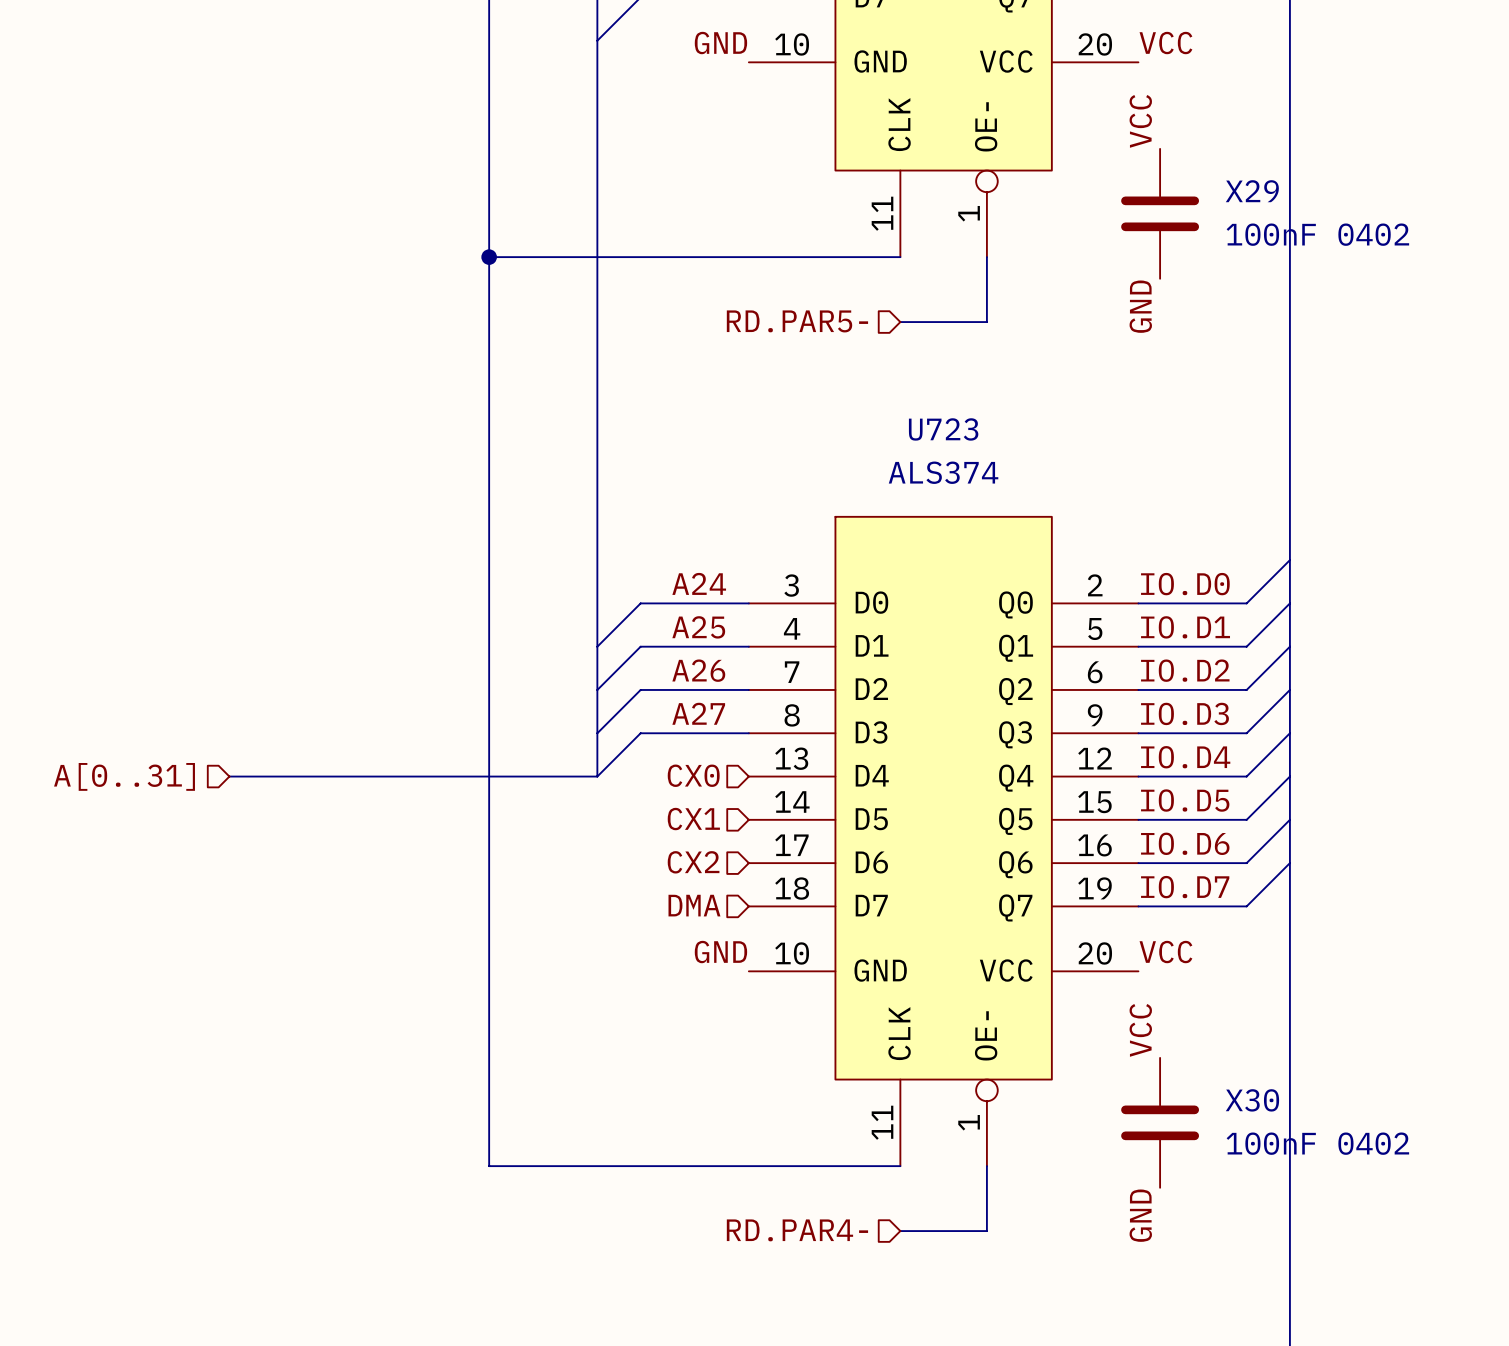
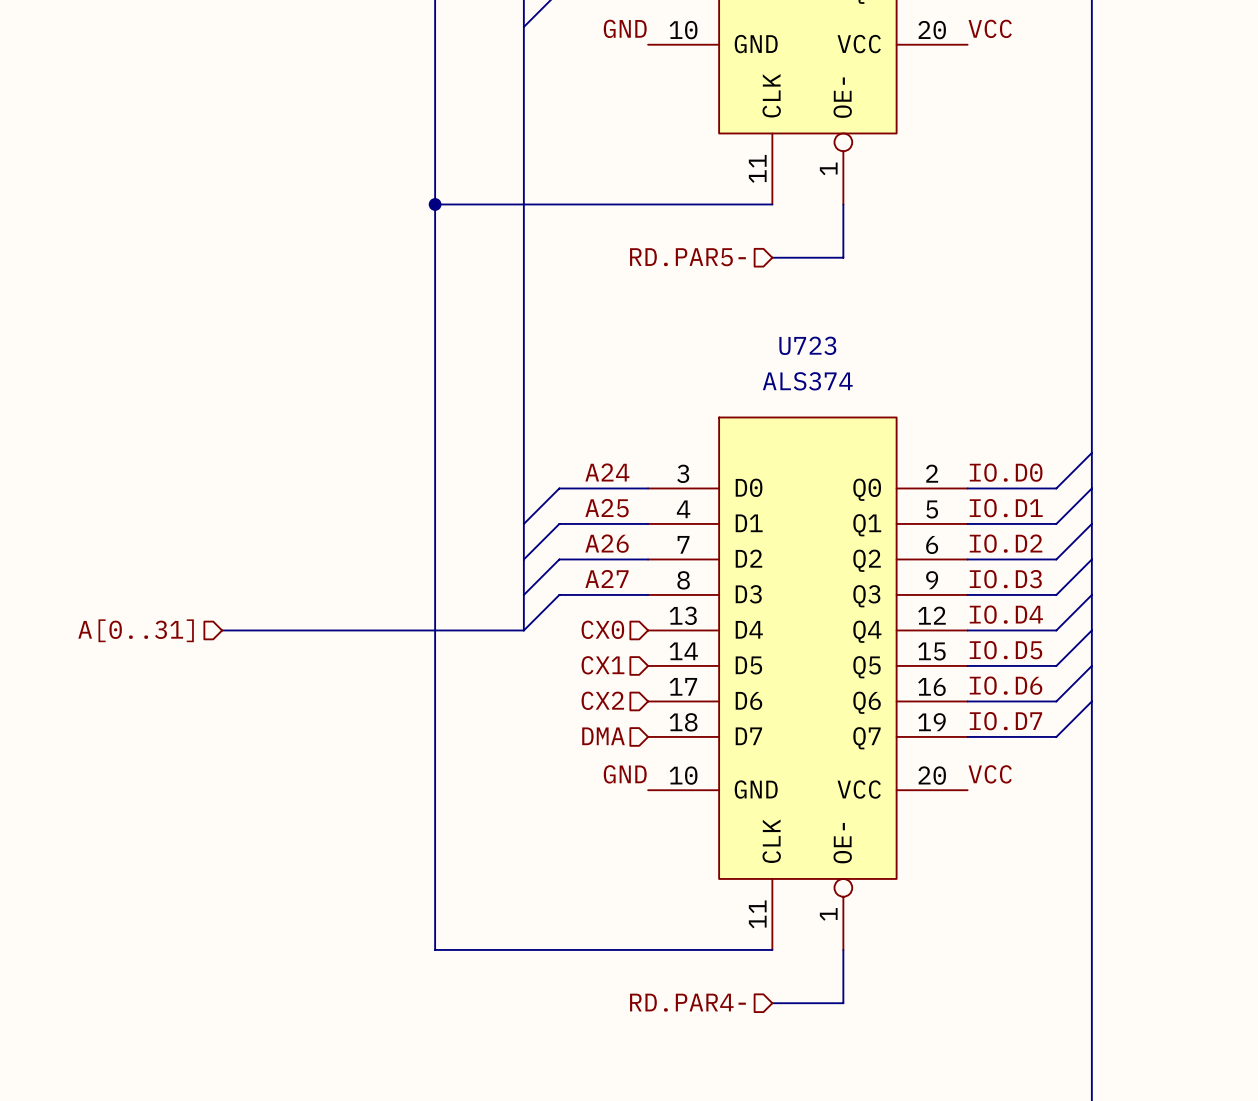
label: VCC (1140, 121) -> none
X29: 100nF 0402 (1160, 213) -> none
label: GND (1140, 306) -> none
label: VCC (1140, 1030) -> none
X30: 100nF 0402 (1160, 1122) -> none
label: GND (1140, 1215) -> none

